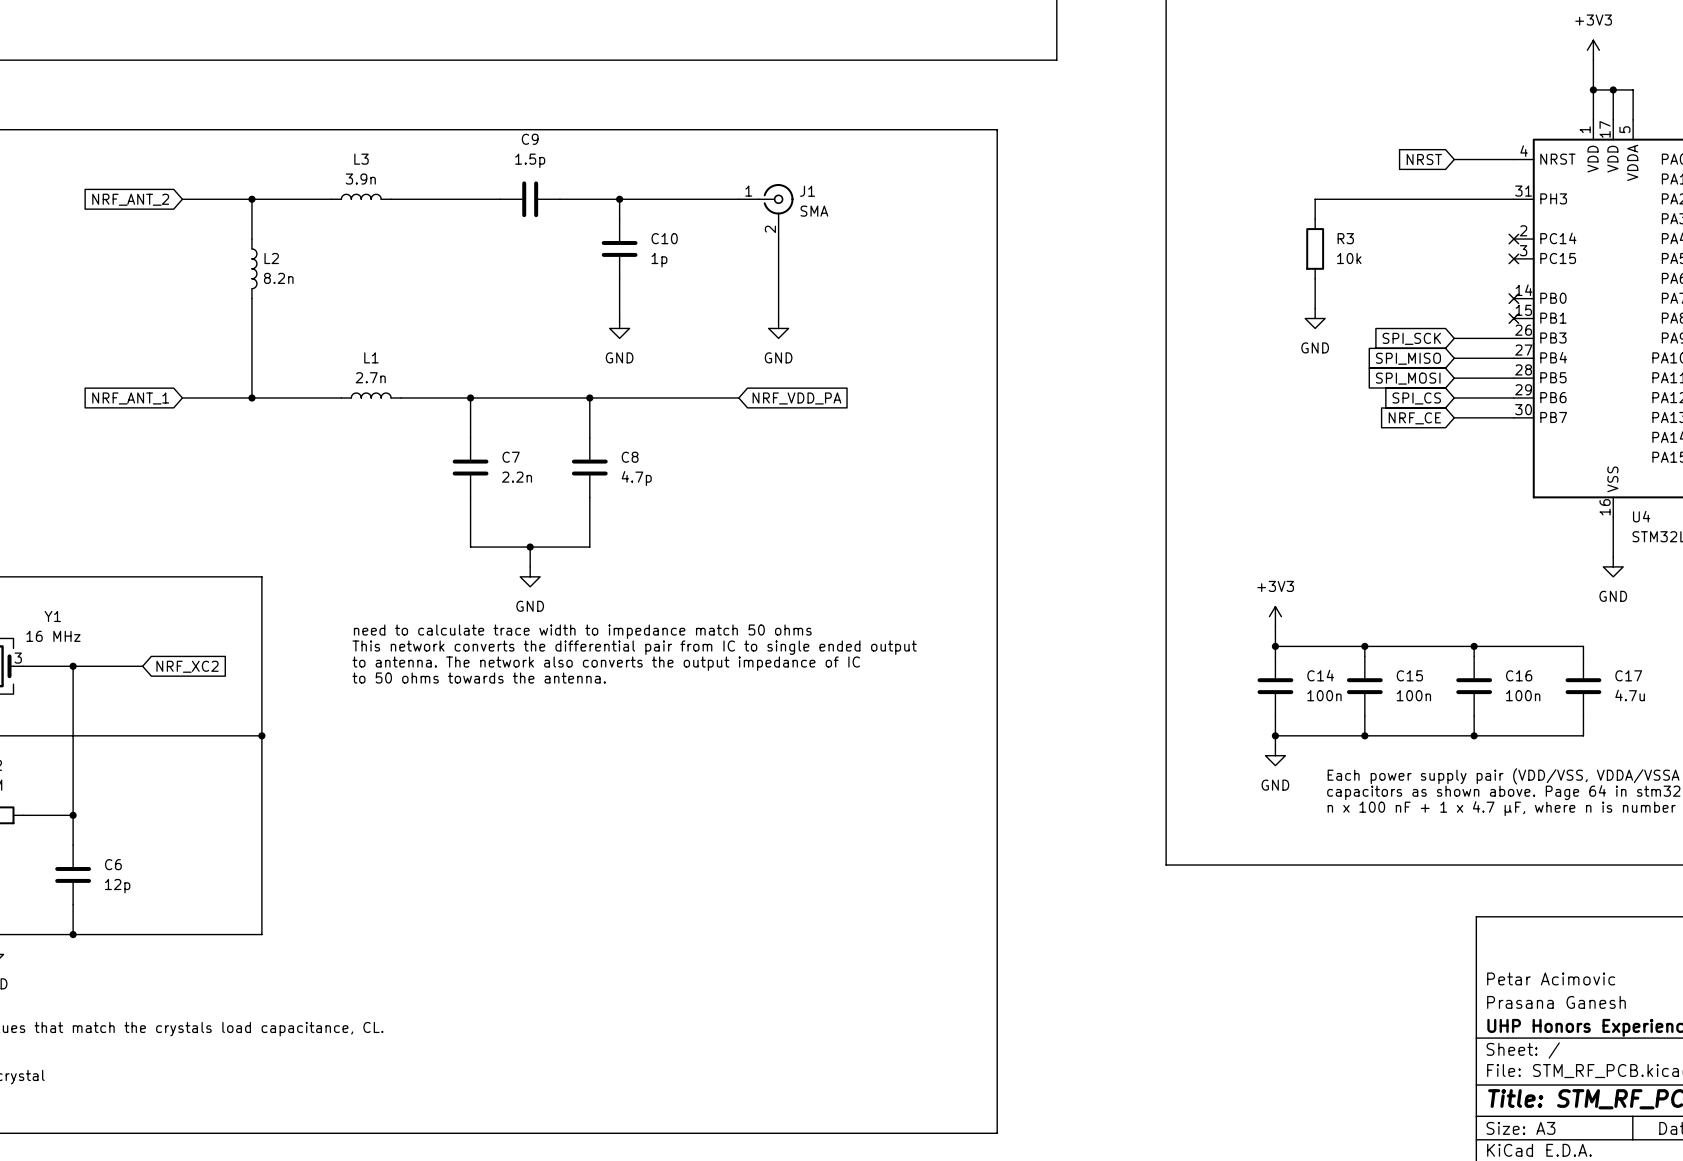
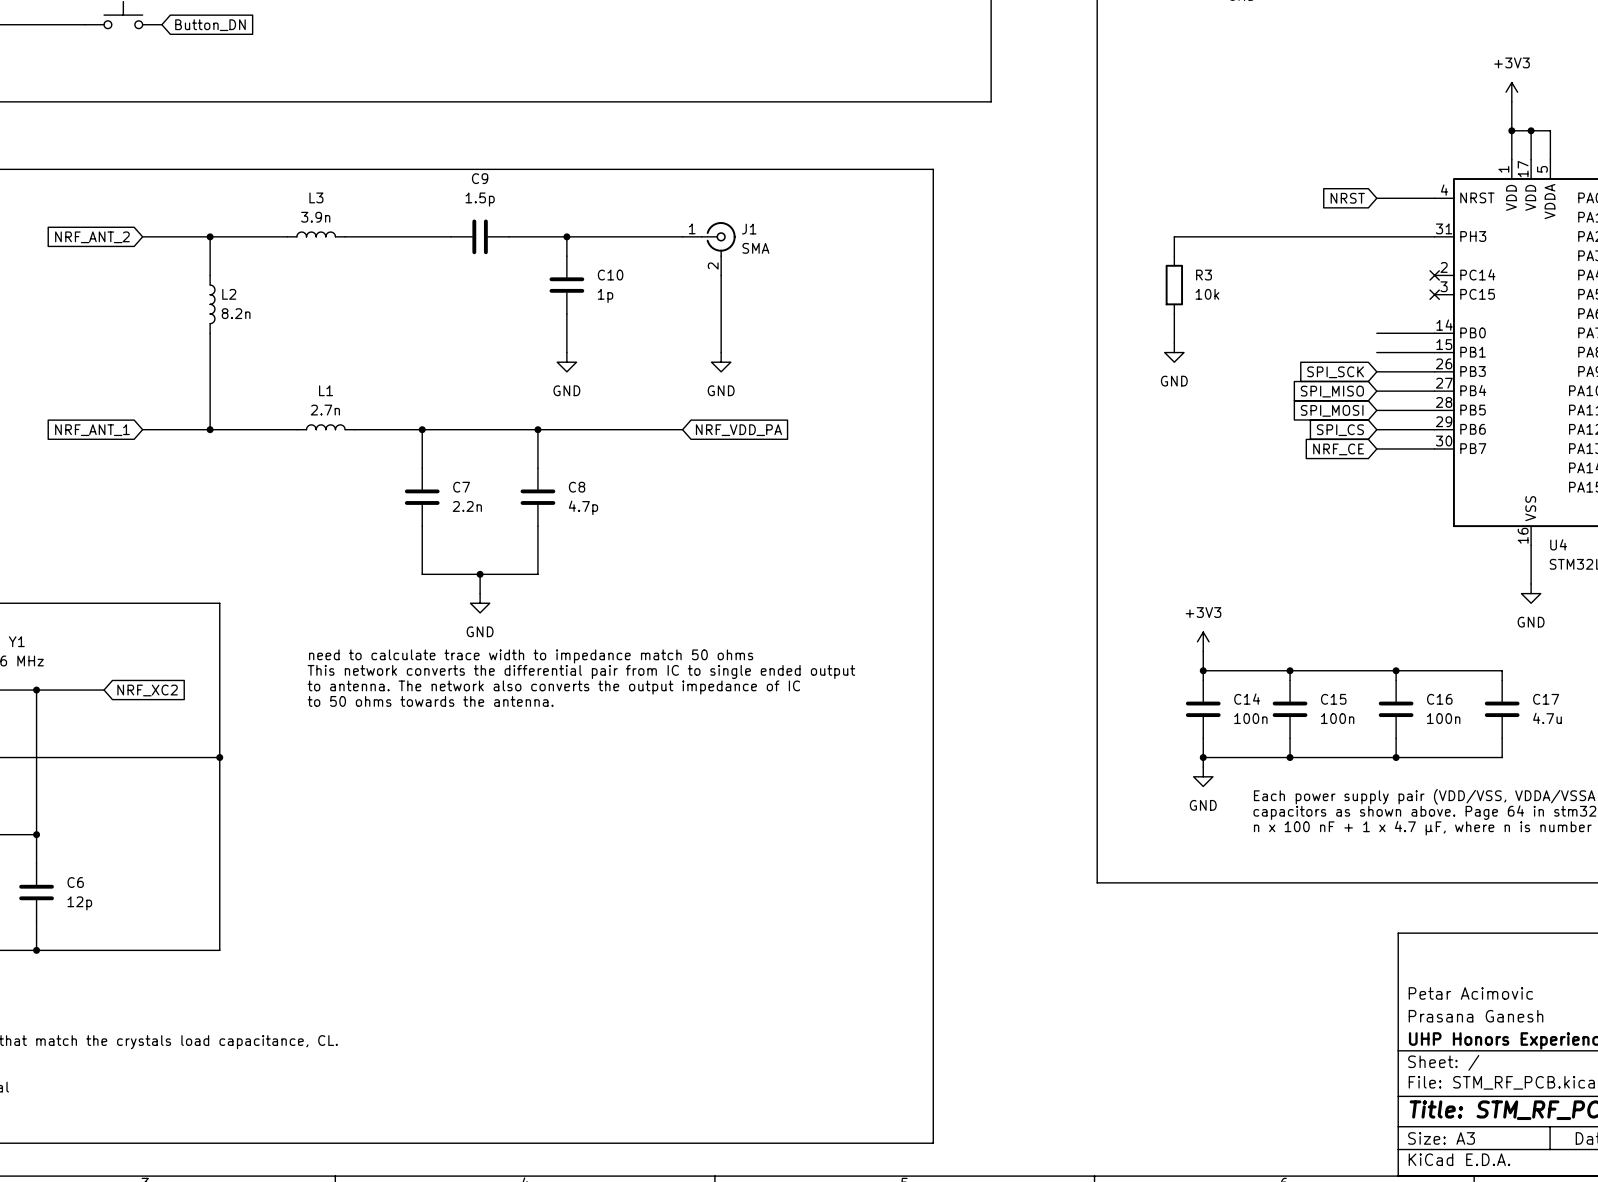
wire: (1315, 199) (1315, 219) -> (1241, 236) (1174, 236) (1174, 256)
R3 position: (1315, 248) -> (1174, 285)
wire: (1315, 278) (1315, 308) -> (1174, 313) (1174, 342)
wire: none -> (1376, 333) (1434, 333)
no-connect mark: (1513, 298) -> none
power symbol position: GND (1315, 318) -> GND (1174, 352)
wire: none -> (1376, 352) (1434, 352)
no-connect mark: (1513, 318) -> none

